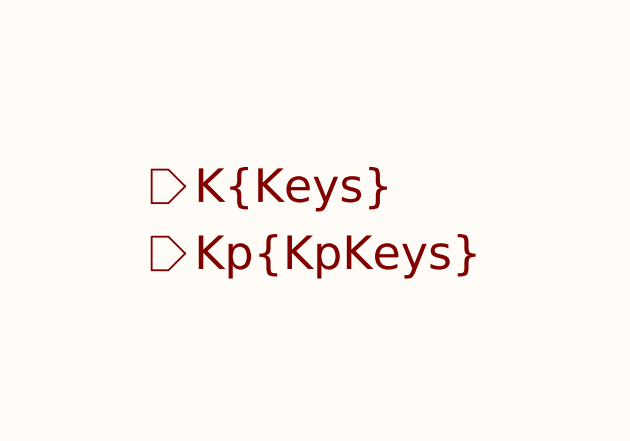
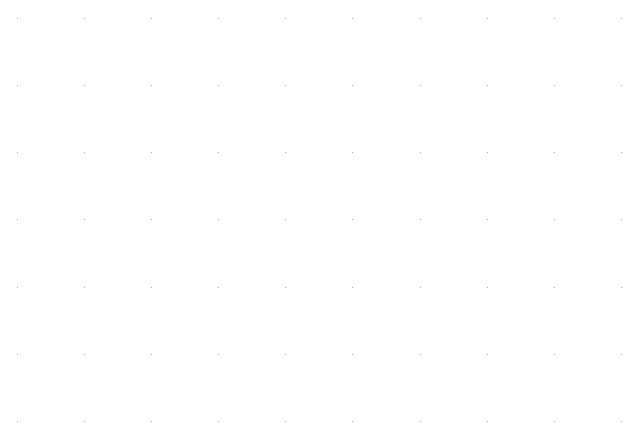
hierarchical label: K{Keys} (292, 189) -> none
hierarchical label: Kp{KpKeys} (337, 256) -> none

